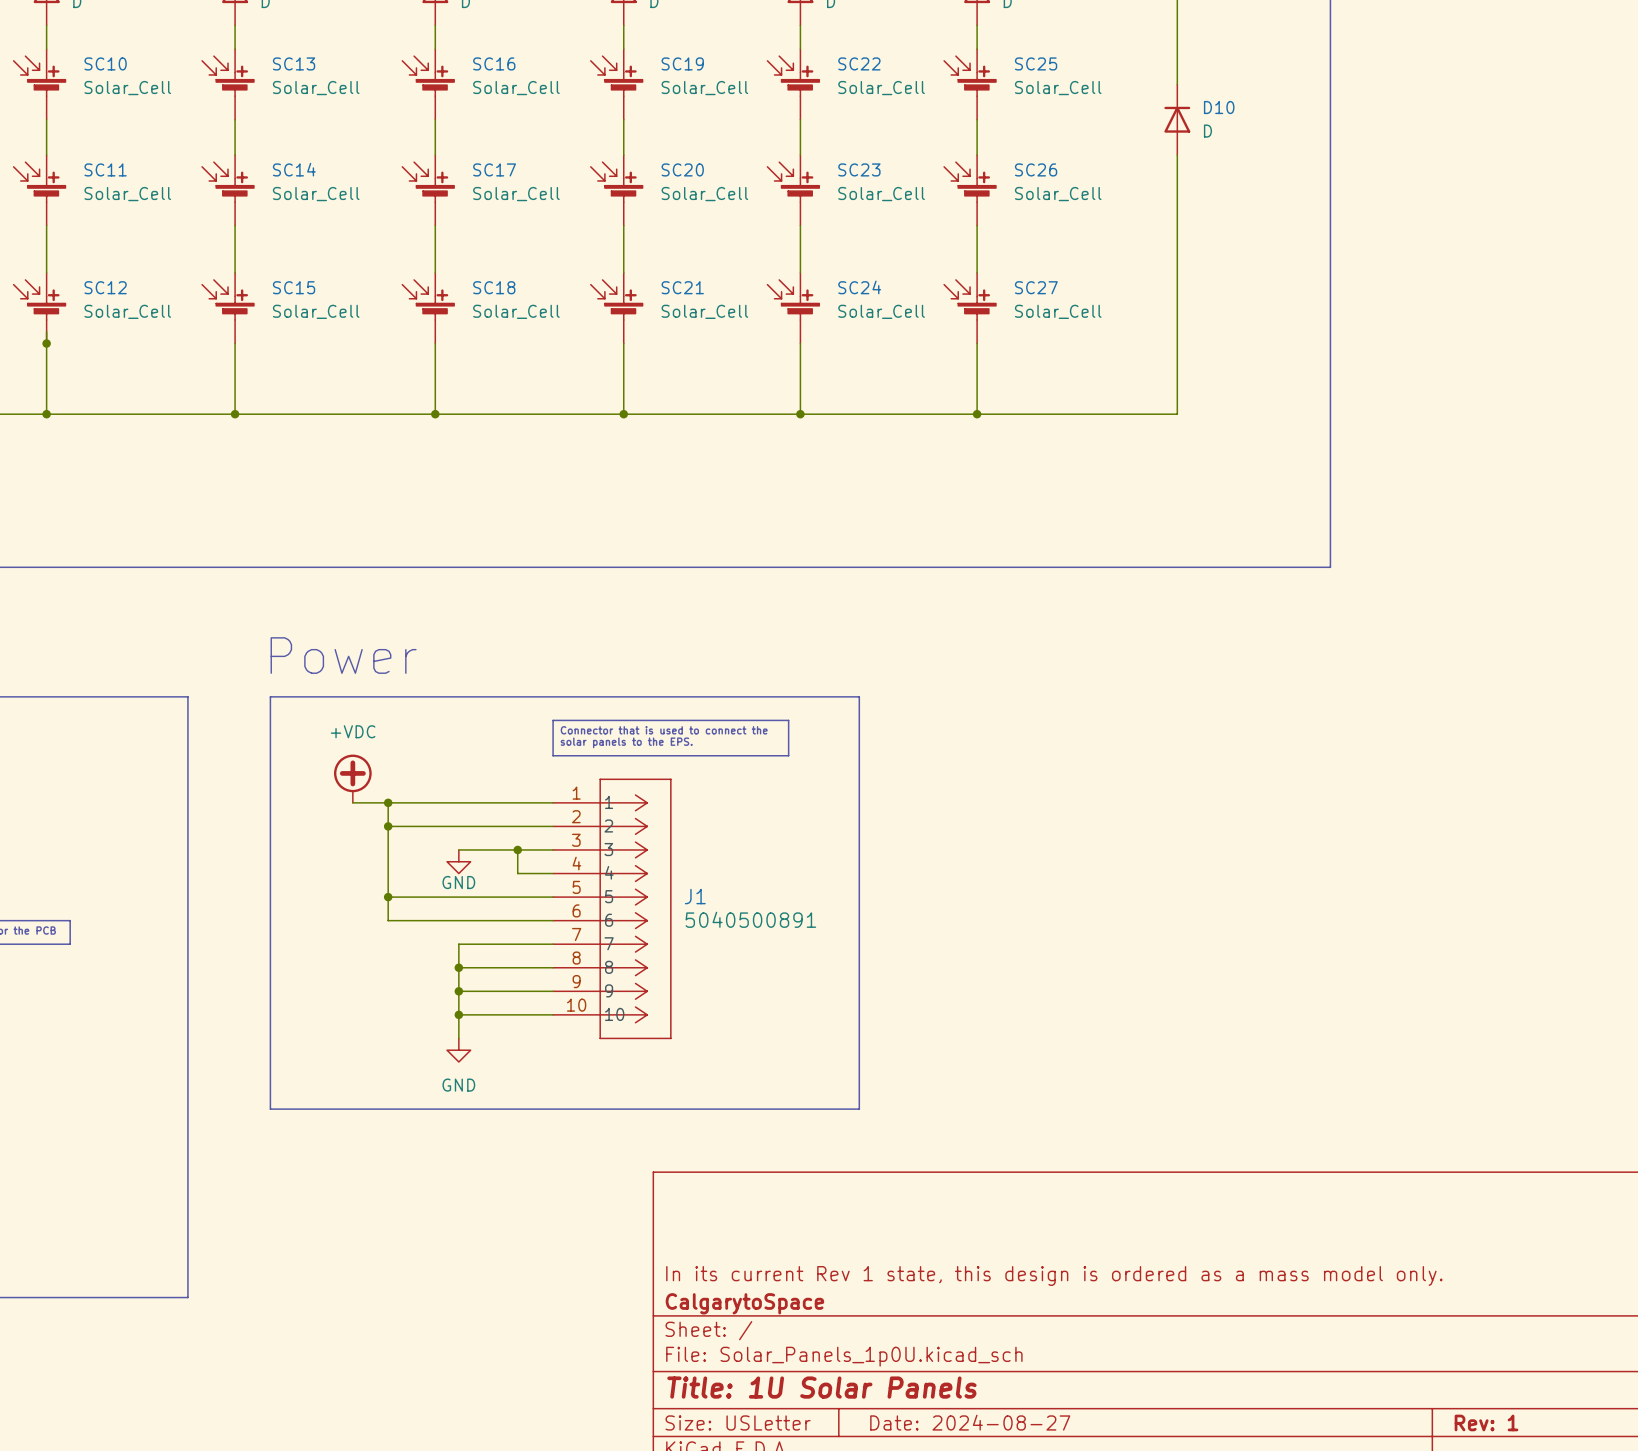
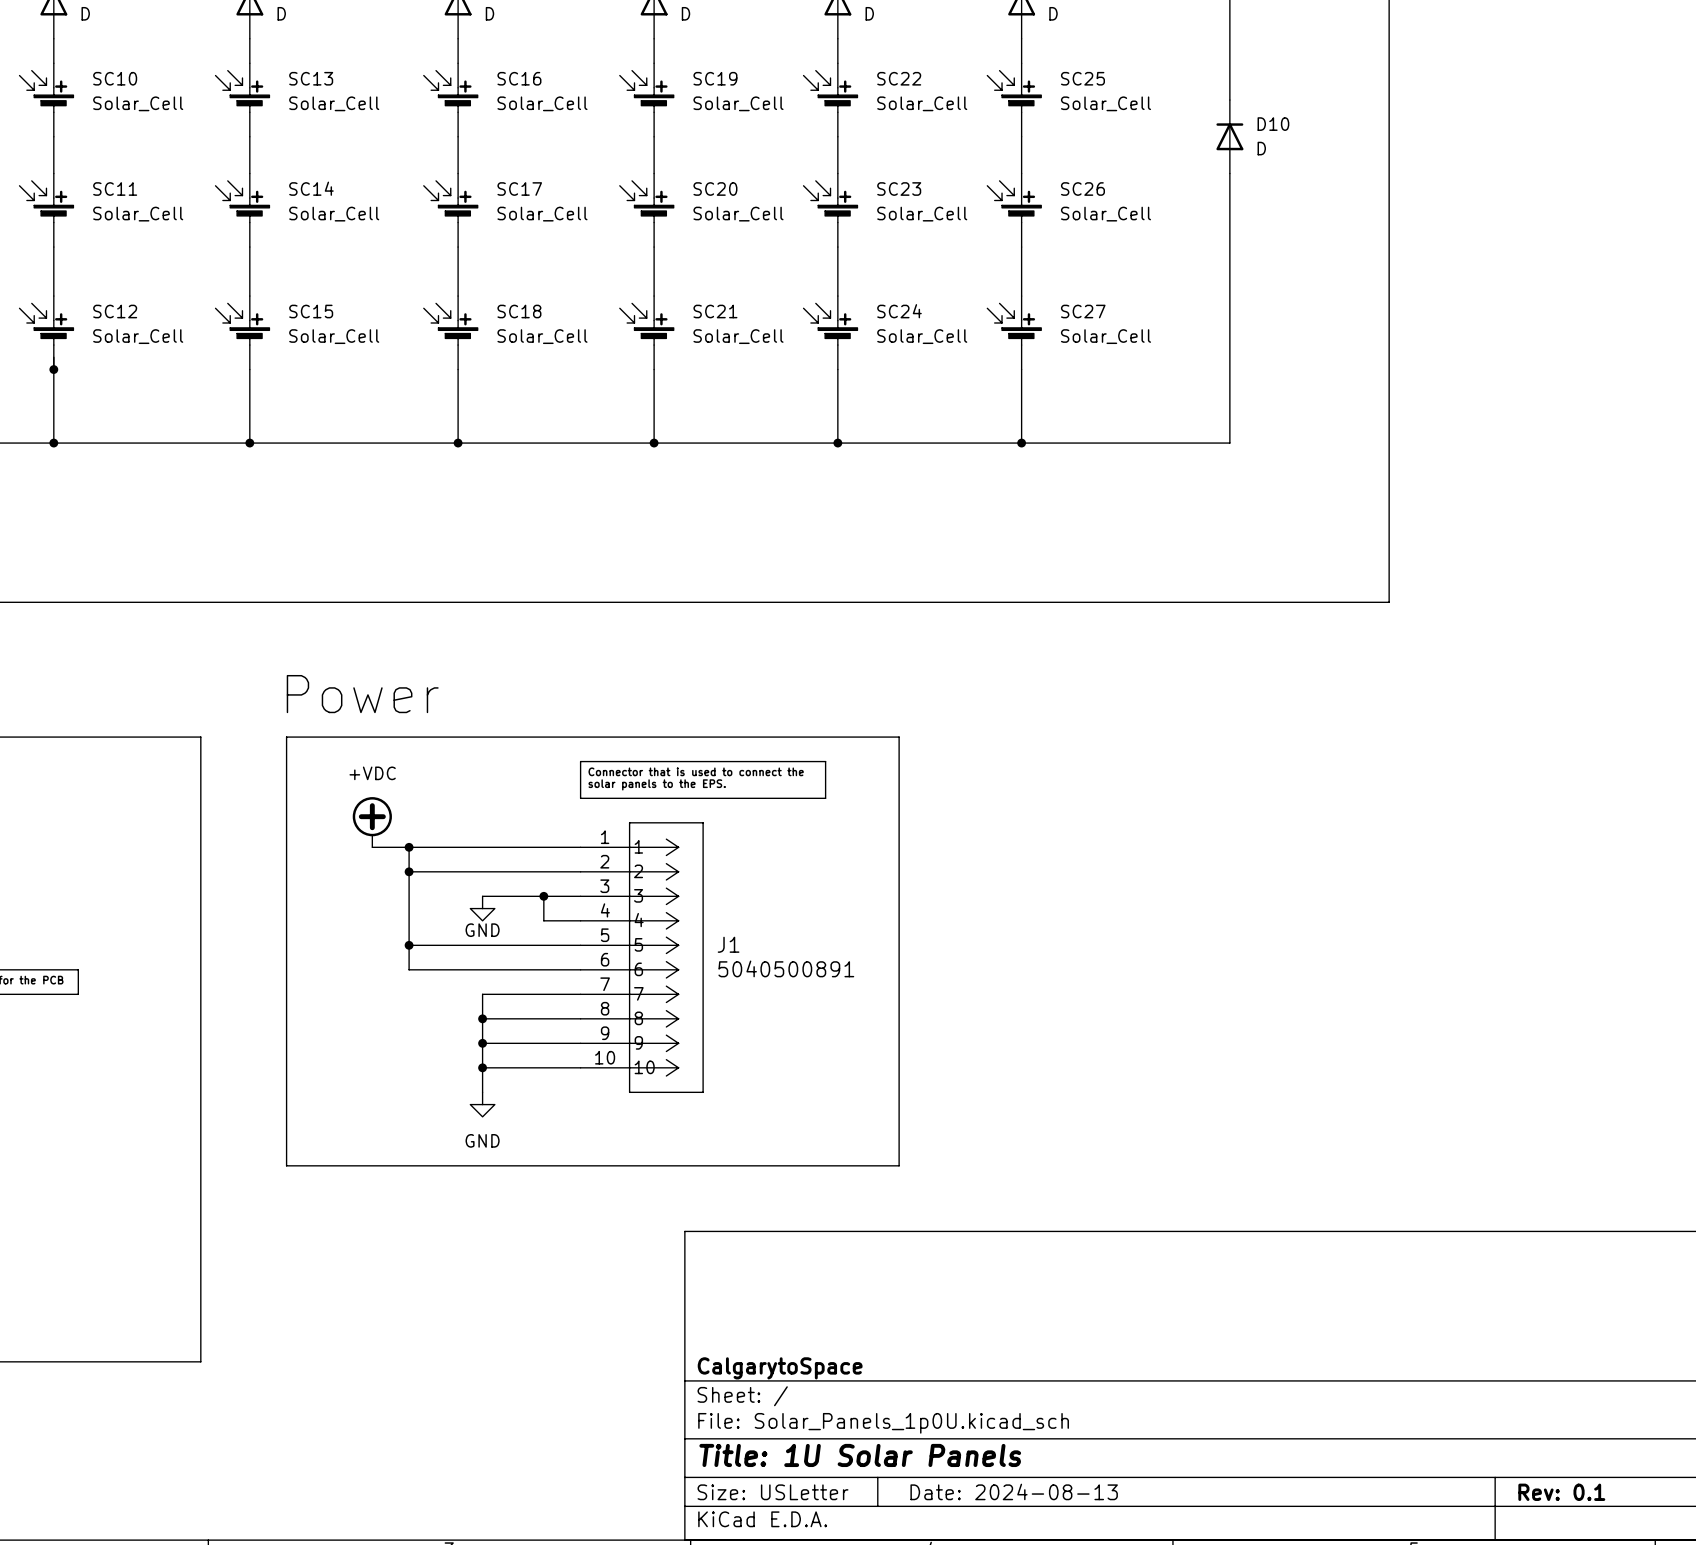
title block: In its current Rev 1 state, this design is ordered as a mass model only. (1054, 1275) -> none
title block: Date: 2024-08-27 (970, 1422) -> Date: 2024-08-13 (1014, 1491)
title block: Rev: 1 (1486, 1422) -> Rev: 0.1 (1561, 1492)

